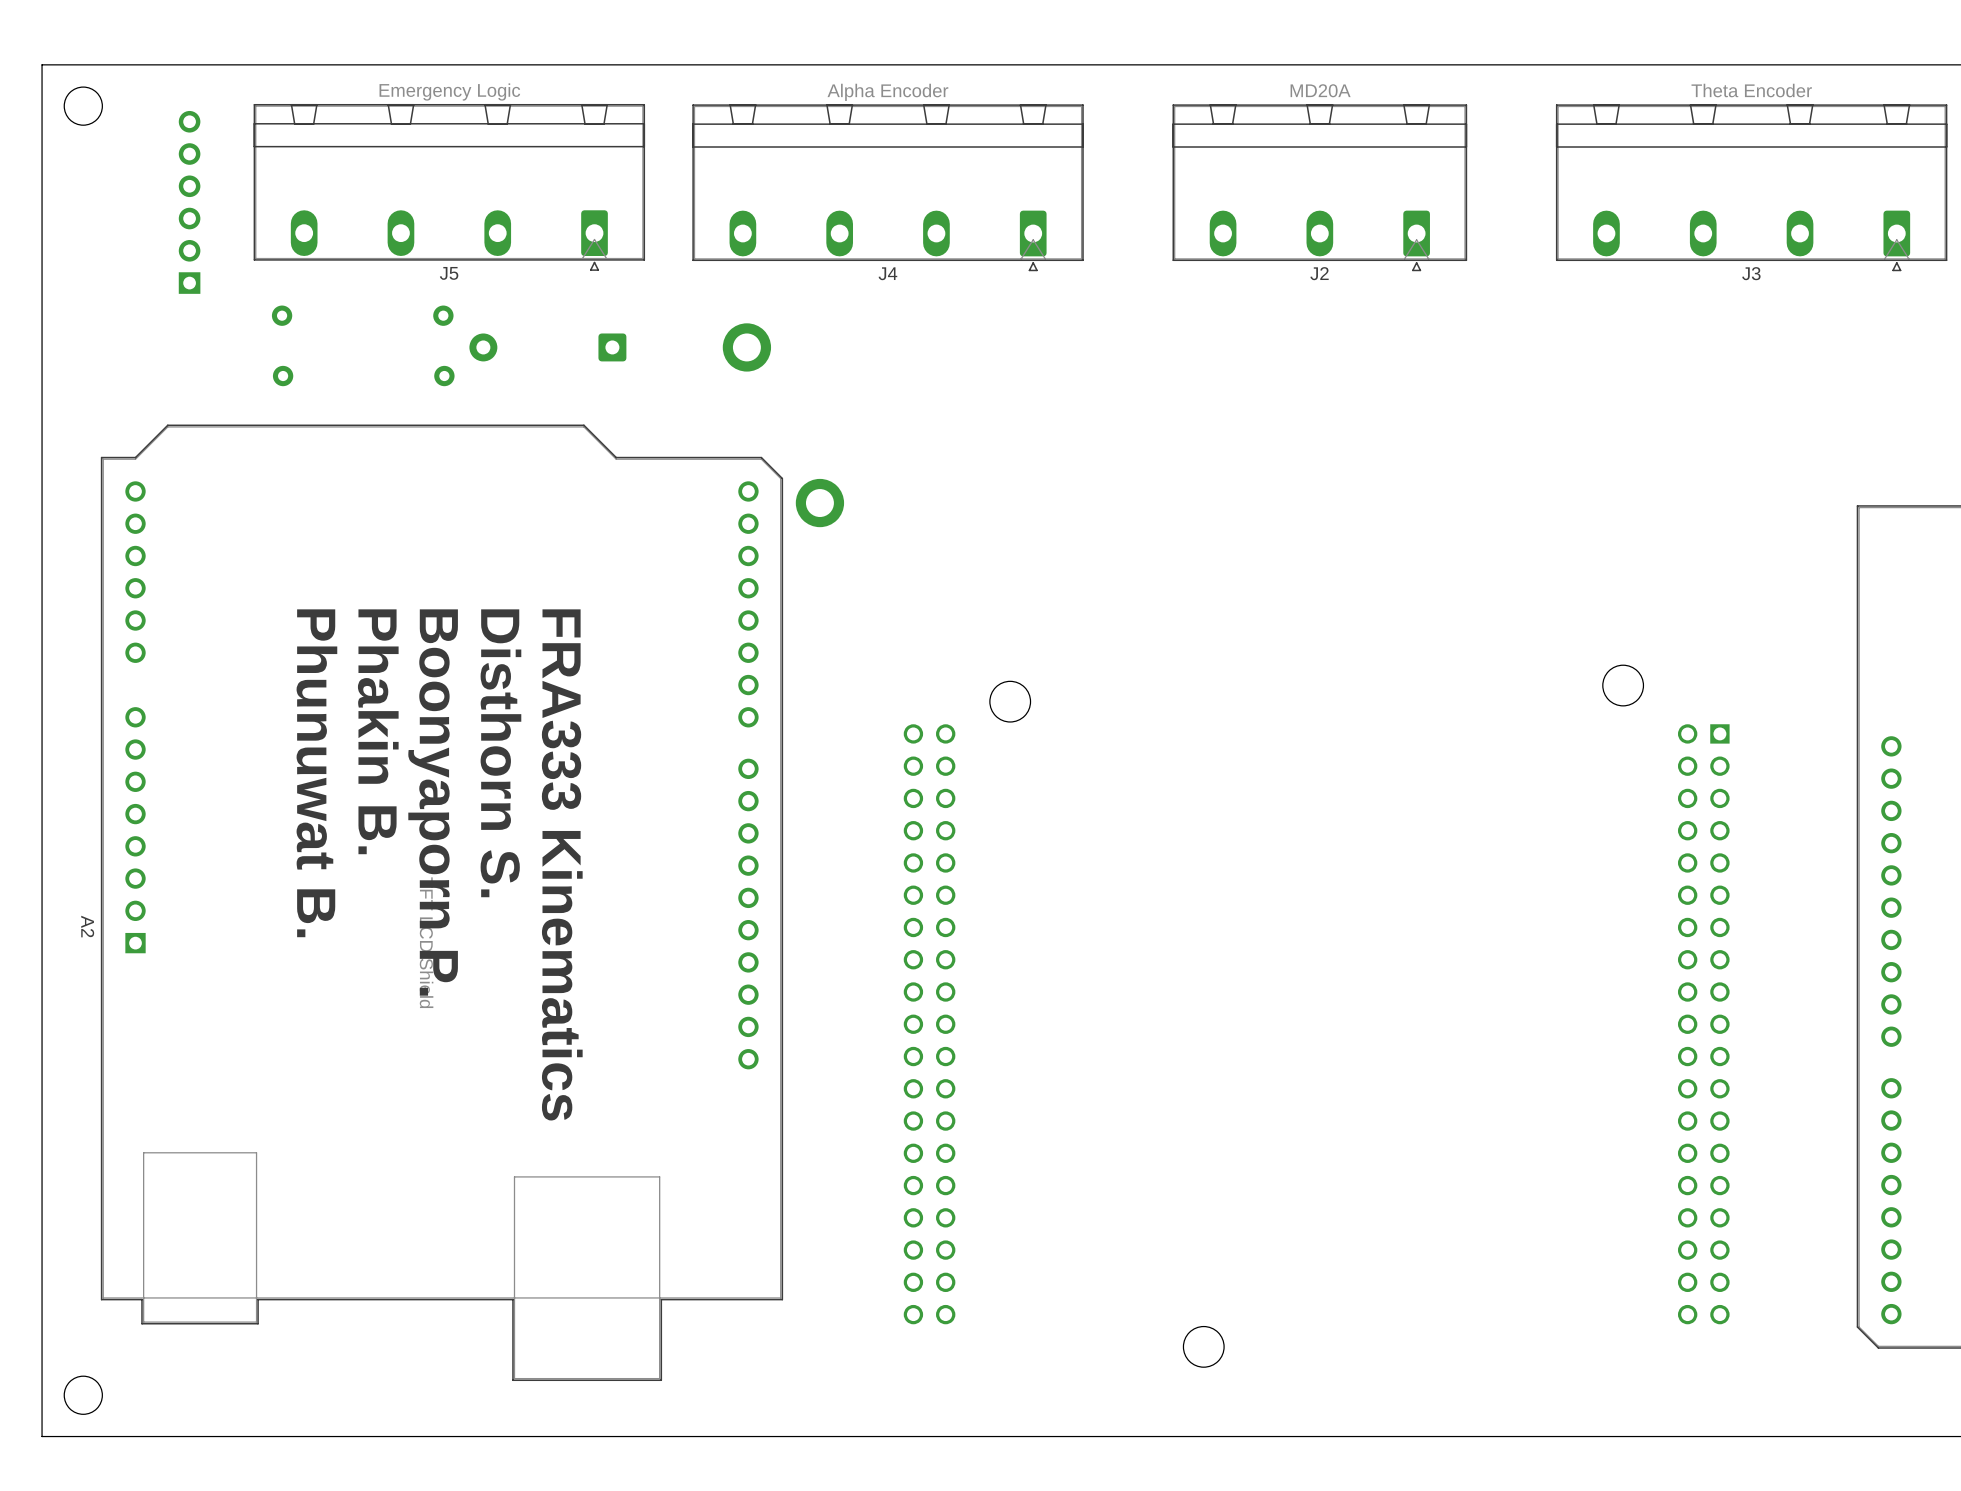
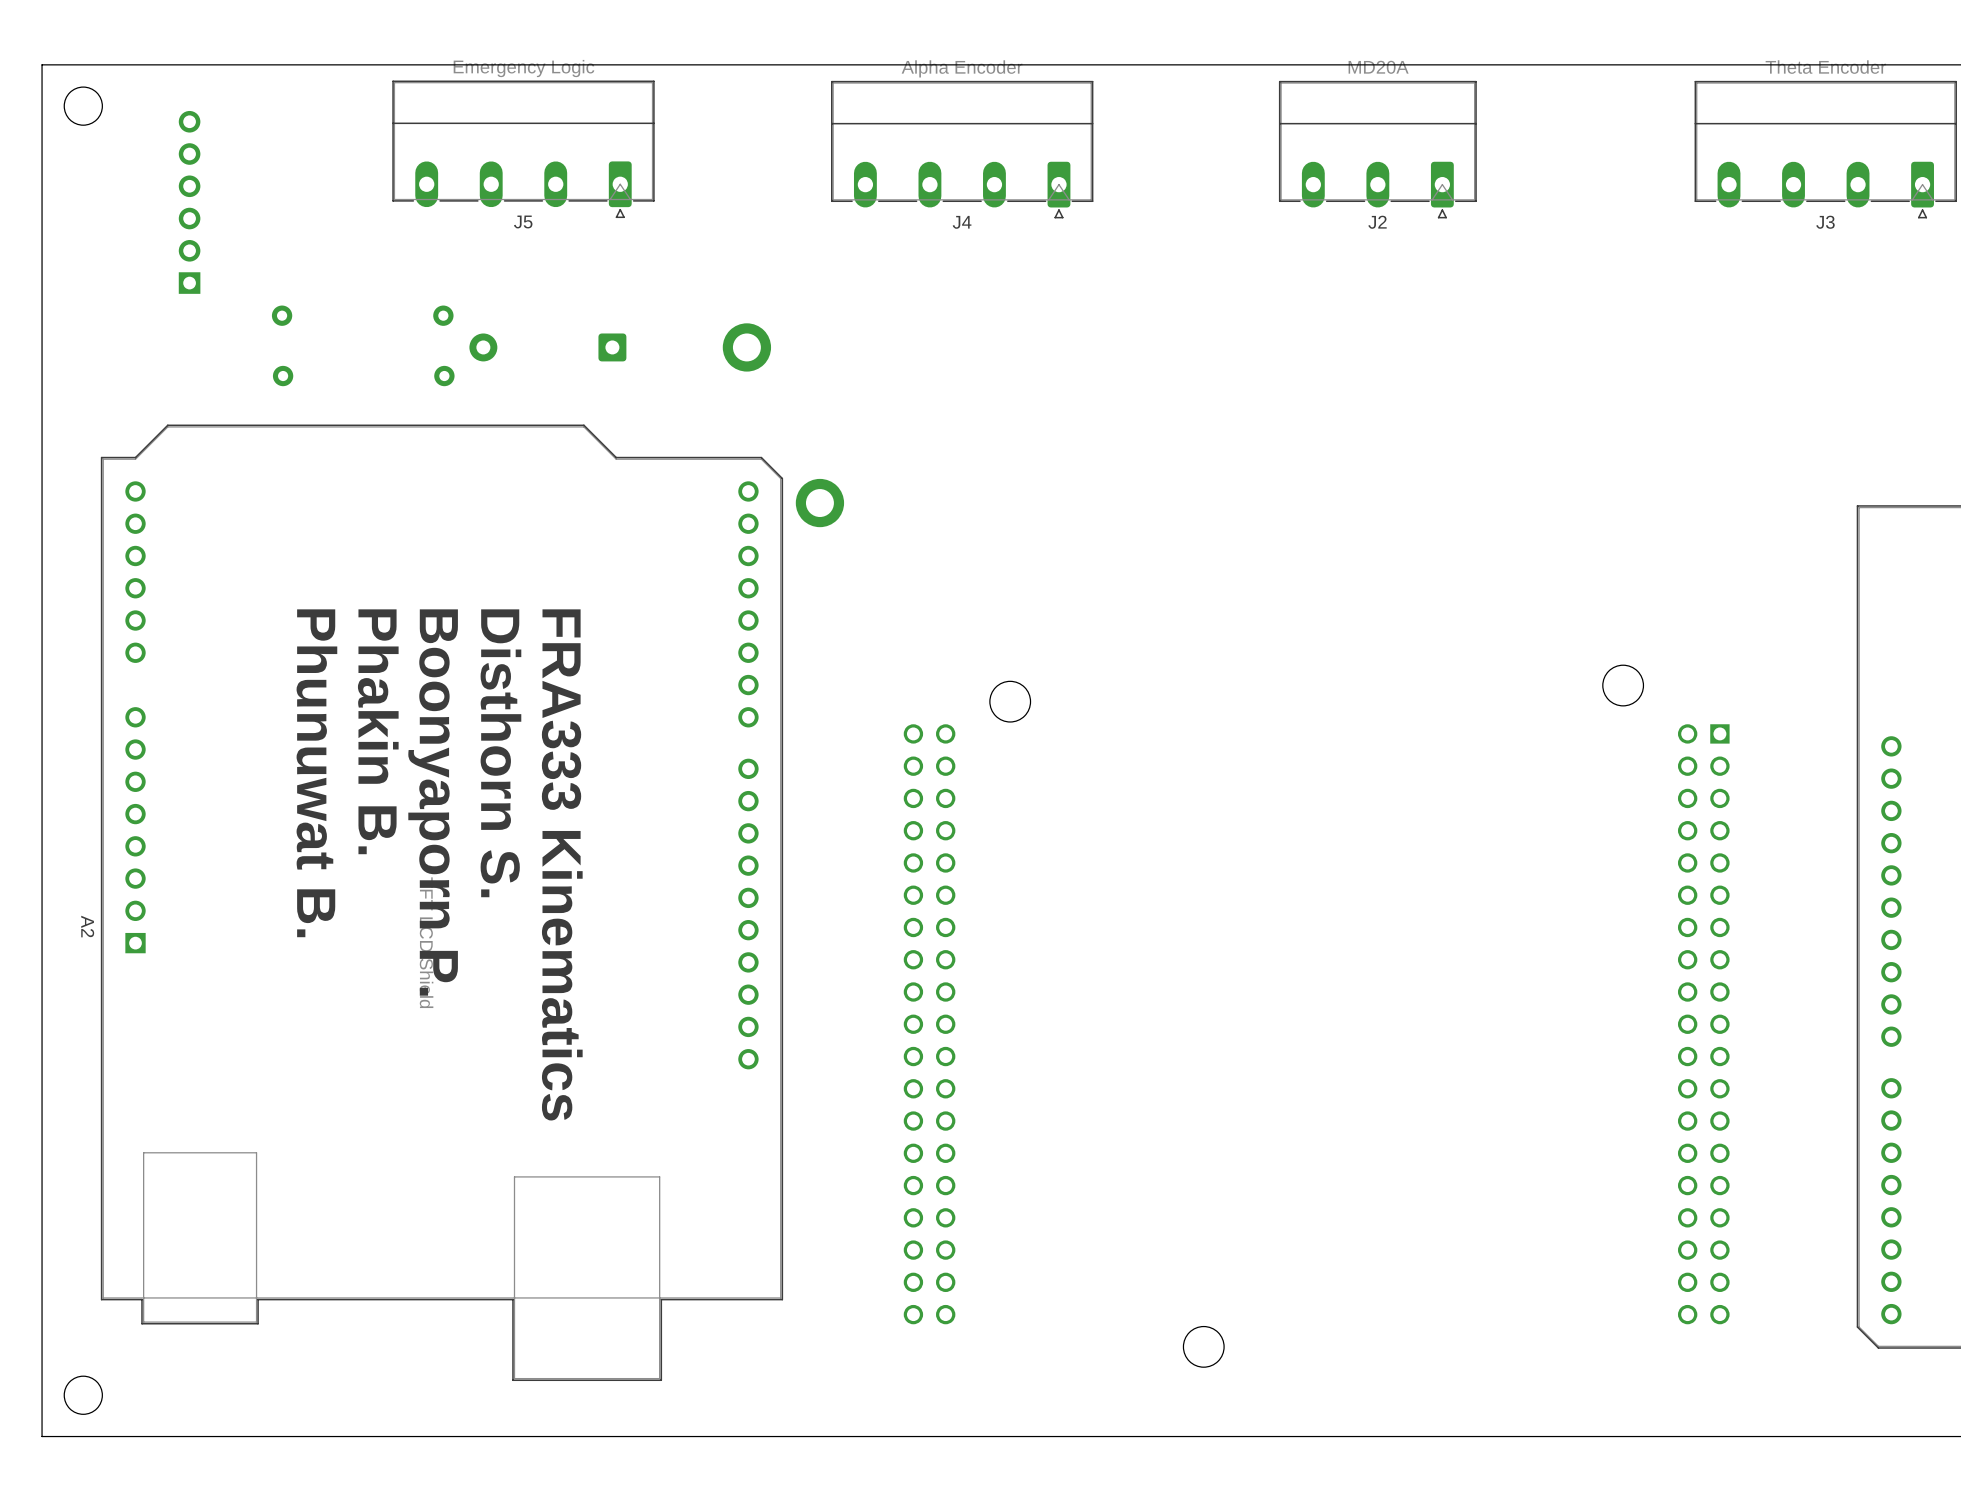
J5 footprint: [253, 103, 646, 271] -> [392, 80, 655, 219]
J4 footprint: [692, 104, 1084, 272] -> [831, 80, 1094, 219]
J2 footprint: [1172, 104, 1468, 272] -> [1278, 80, 1477, 219]
J3 footprint: [1555, 104, 1948, 272] -> [1694, 80, 1957, 219]

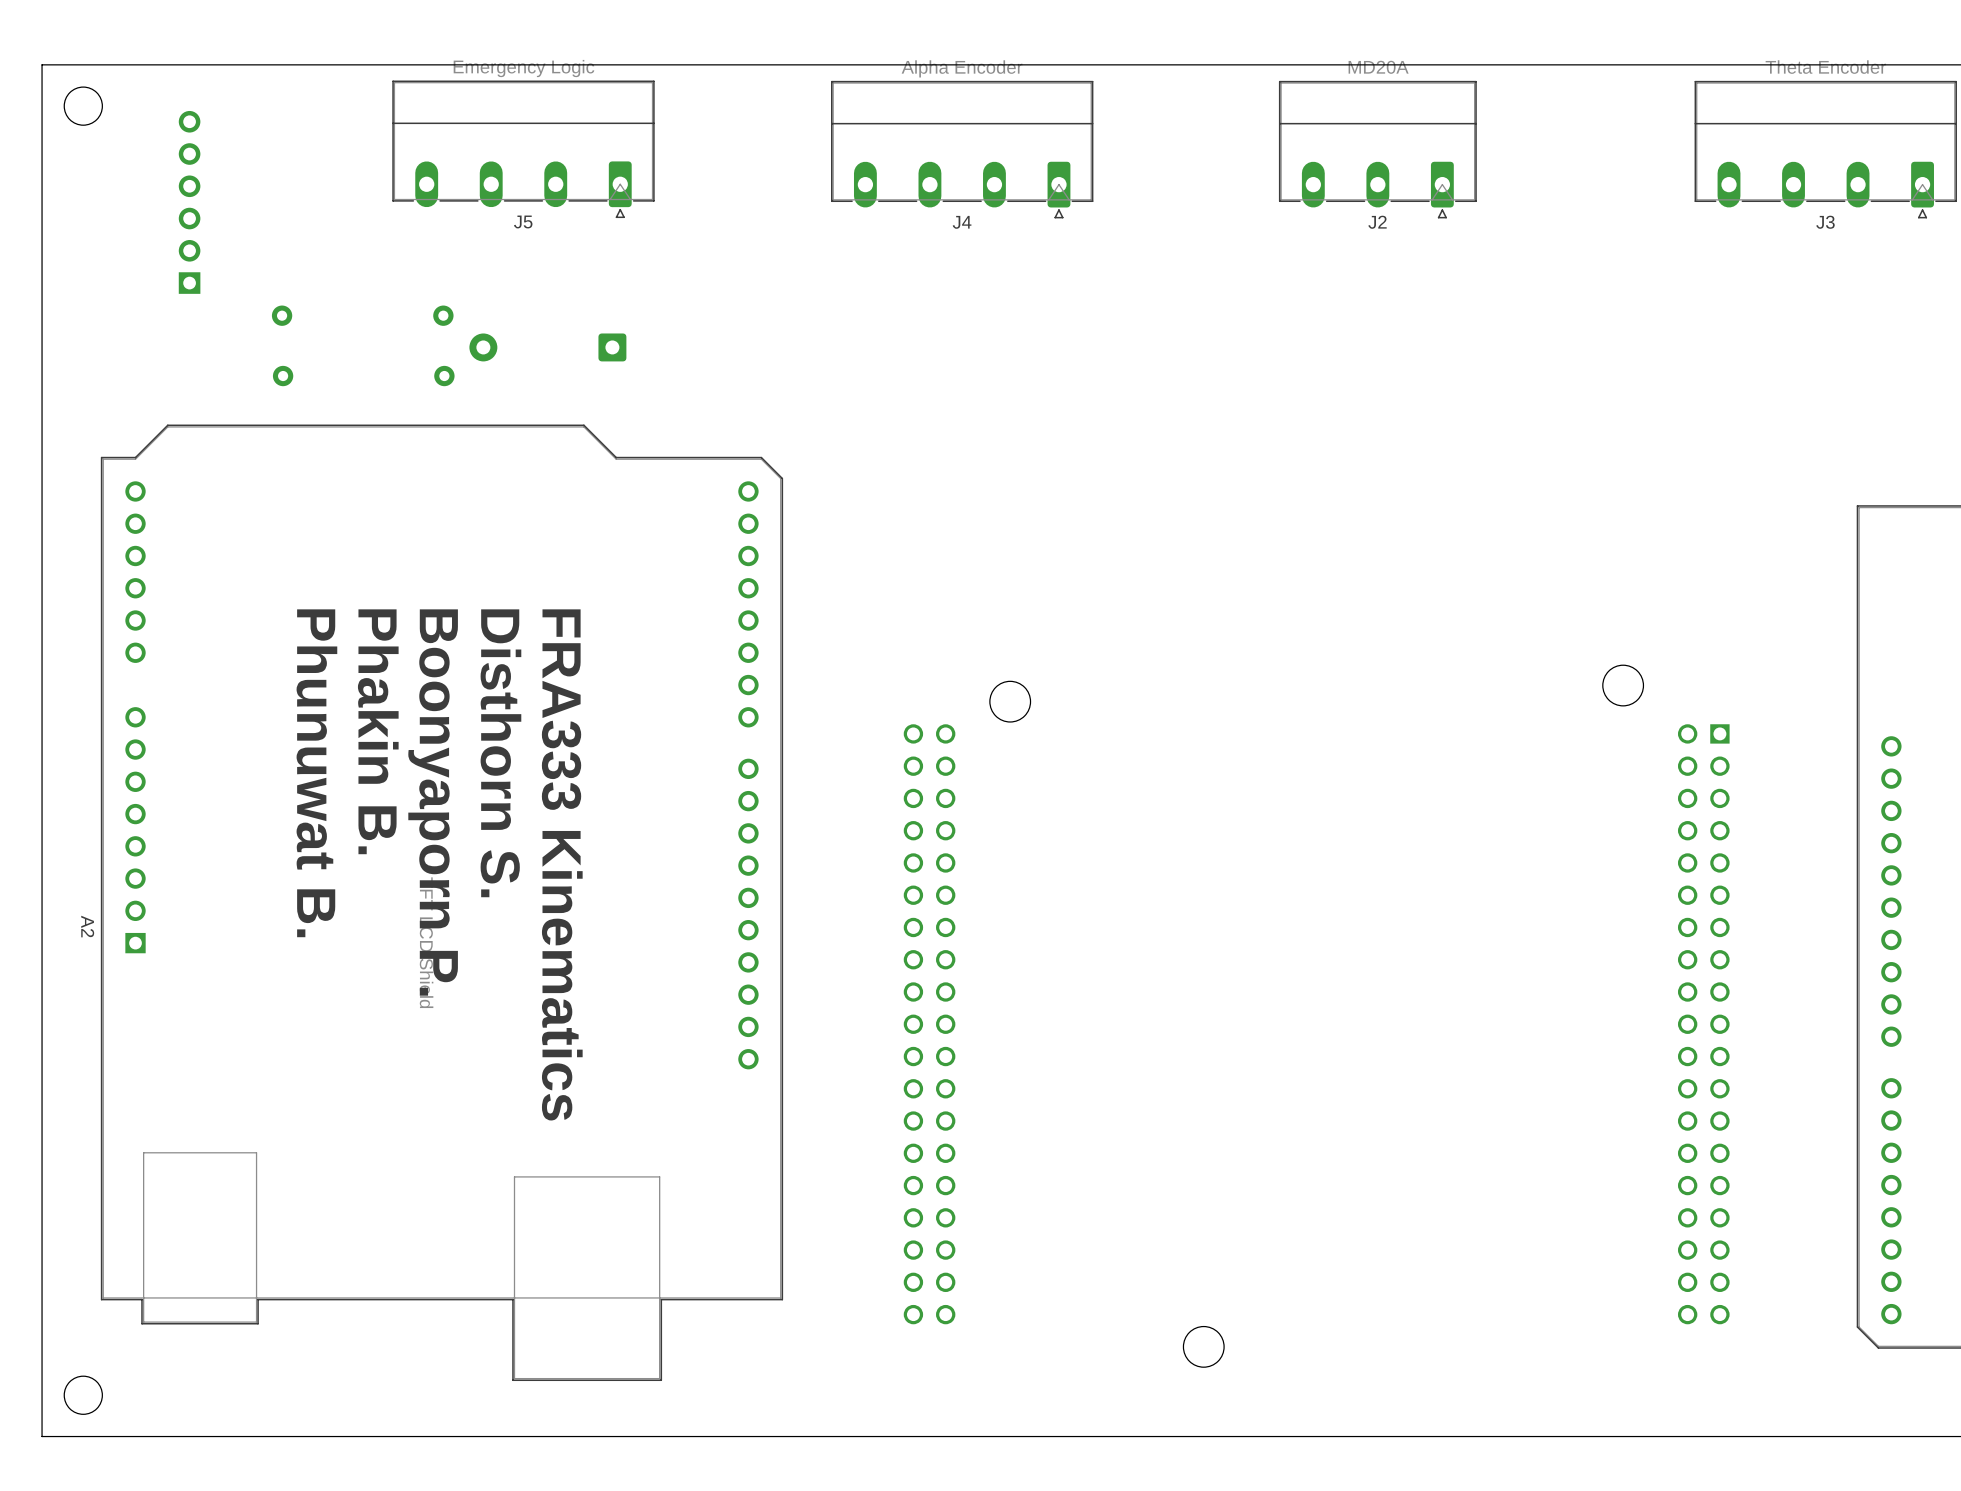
part: (746, 347) -> none
part: (819, 503) -> none

